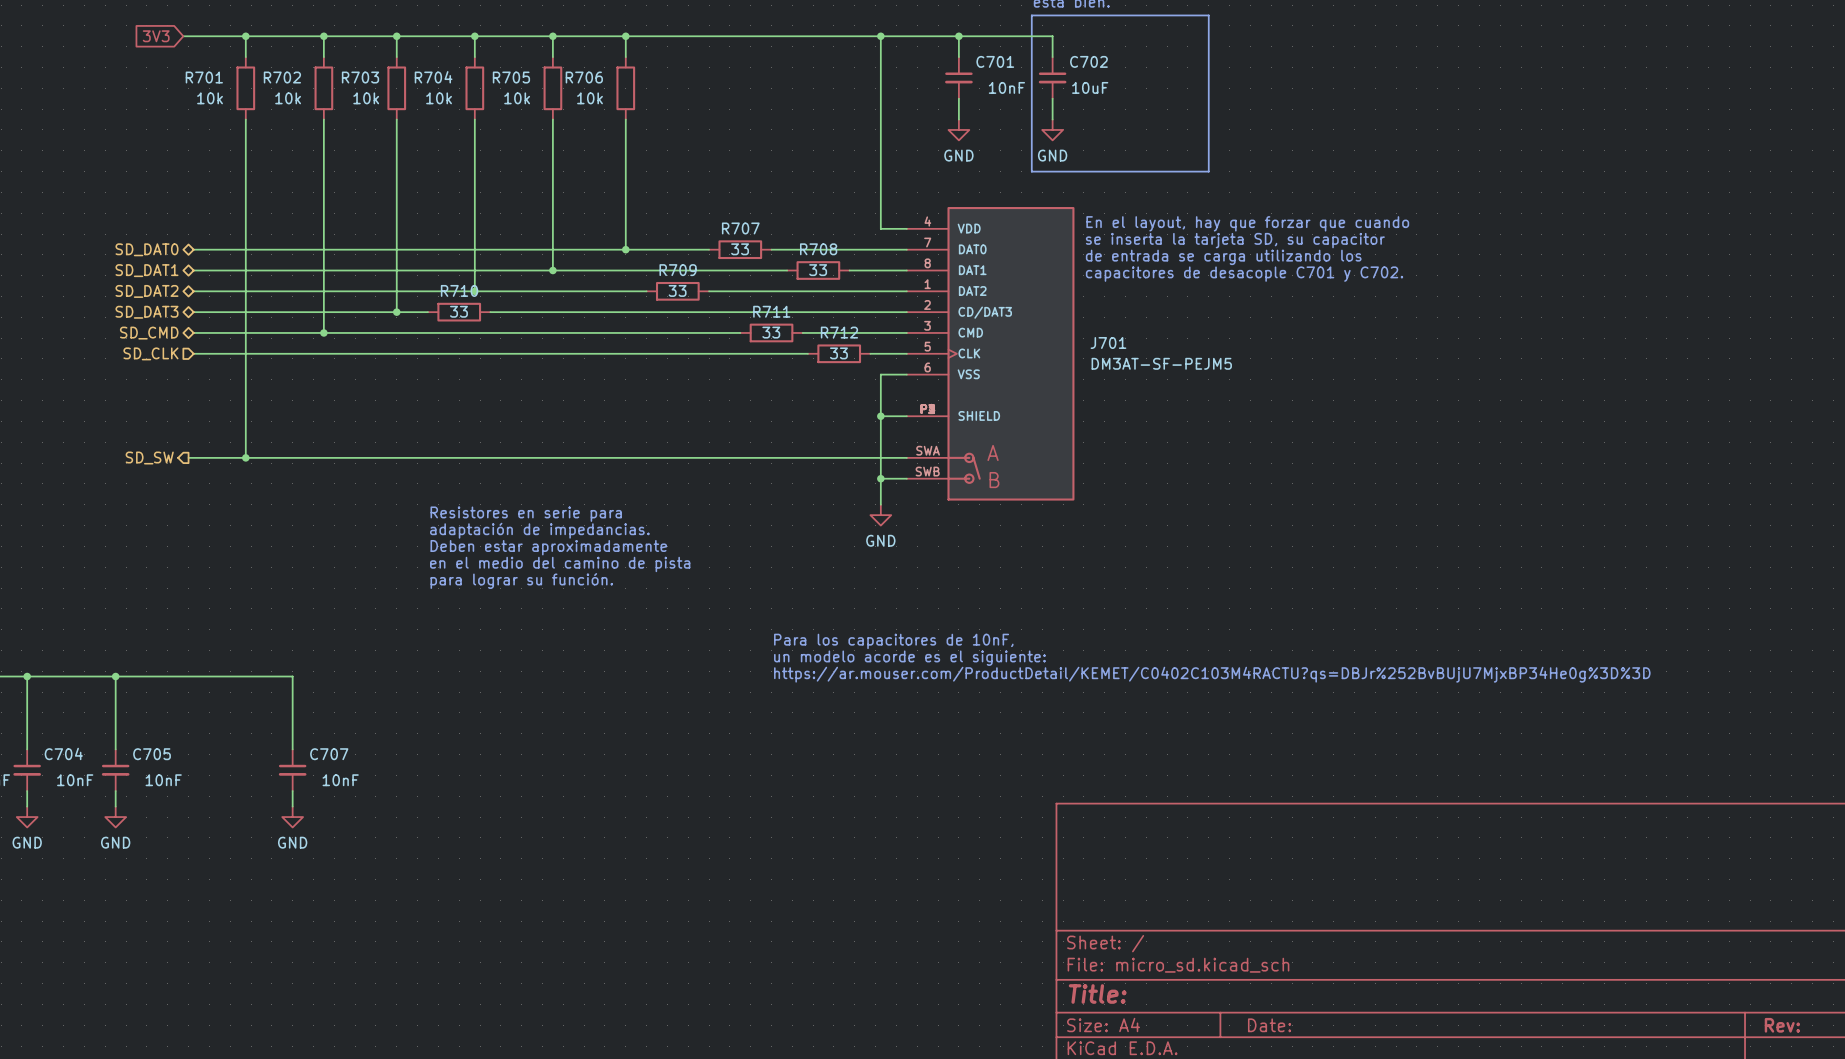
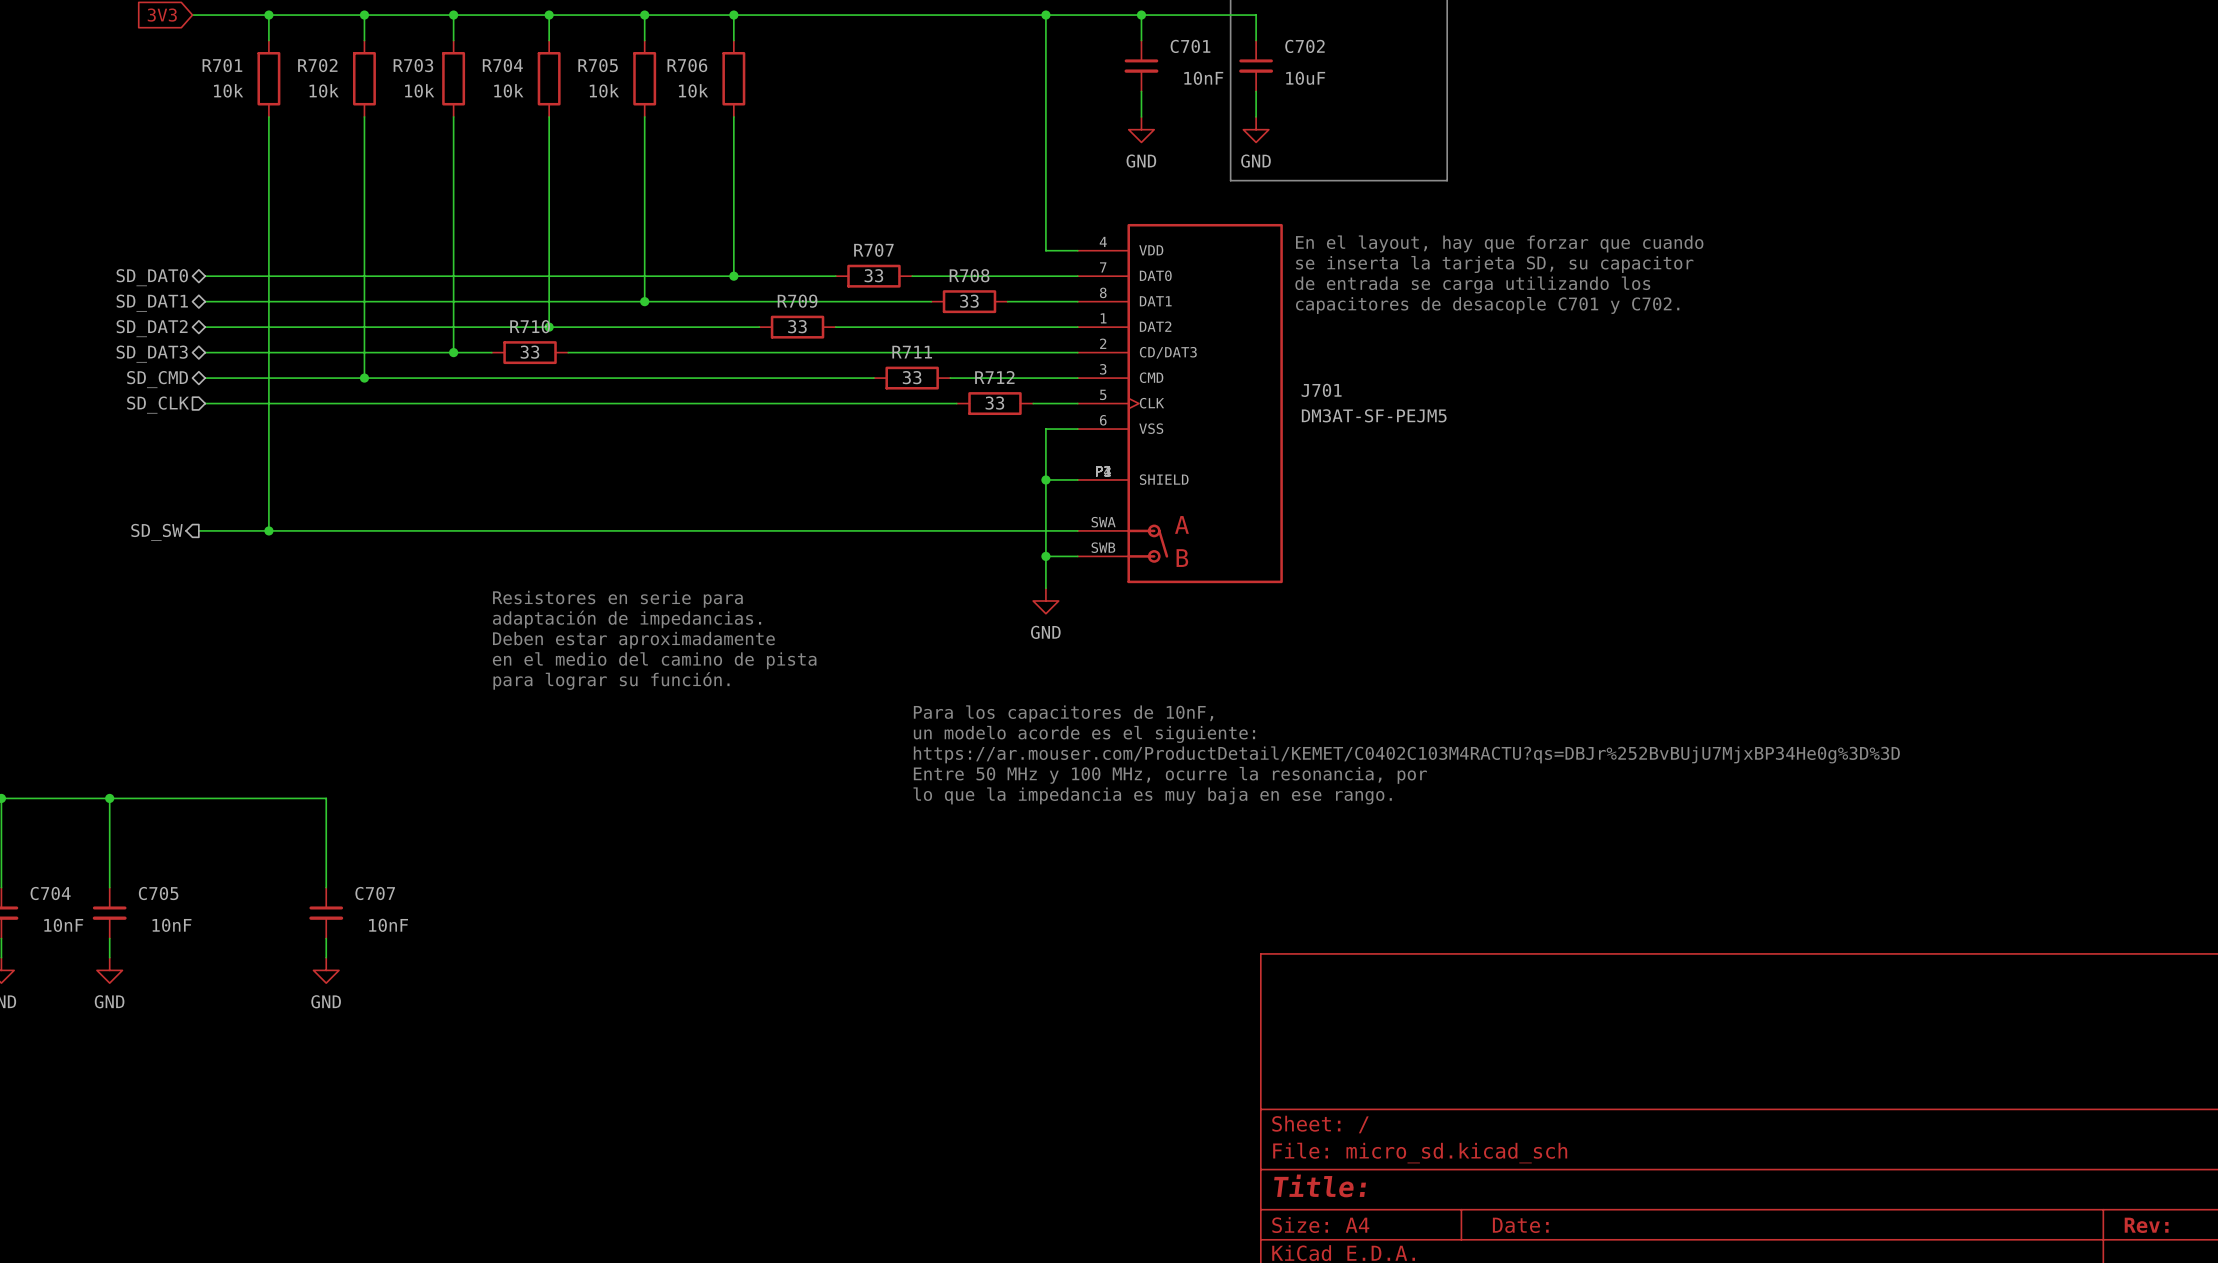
text: none -> Para los capacitores de 10nF, (1063, 713)
text: none -> un modelo acorde es el siguiente: (1084, 734)
text: Para los capacitores de 10nF, (893, 641) -> https://ar.mouser.com/ProductDetail/KEMET/C0402C103M4RACTU?qs=DBJr%252BvBUjU7MjxBP34He0g%3D%3D (1406, 754)
text: un modelo acorde es el siguiente: (909, 658) -> Entre 50 MHz y 100 MHz, ocurre la resonancia, por (1170, 775)
text: https://ar.mouser.com/ProductDetail/KEMET/C0402C103M4RACTU?qs=DBJr%252BvBUjU7MjxBP34He0g%3D%3D (1212, 674) -> lo que la impedancia es muy baja en ese rango. (1152, 795)

